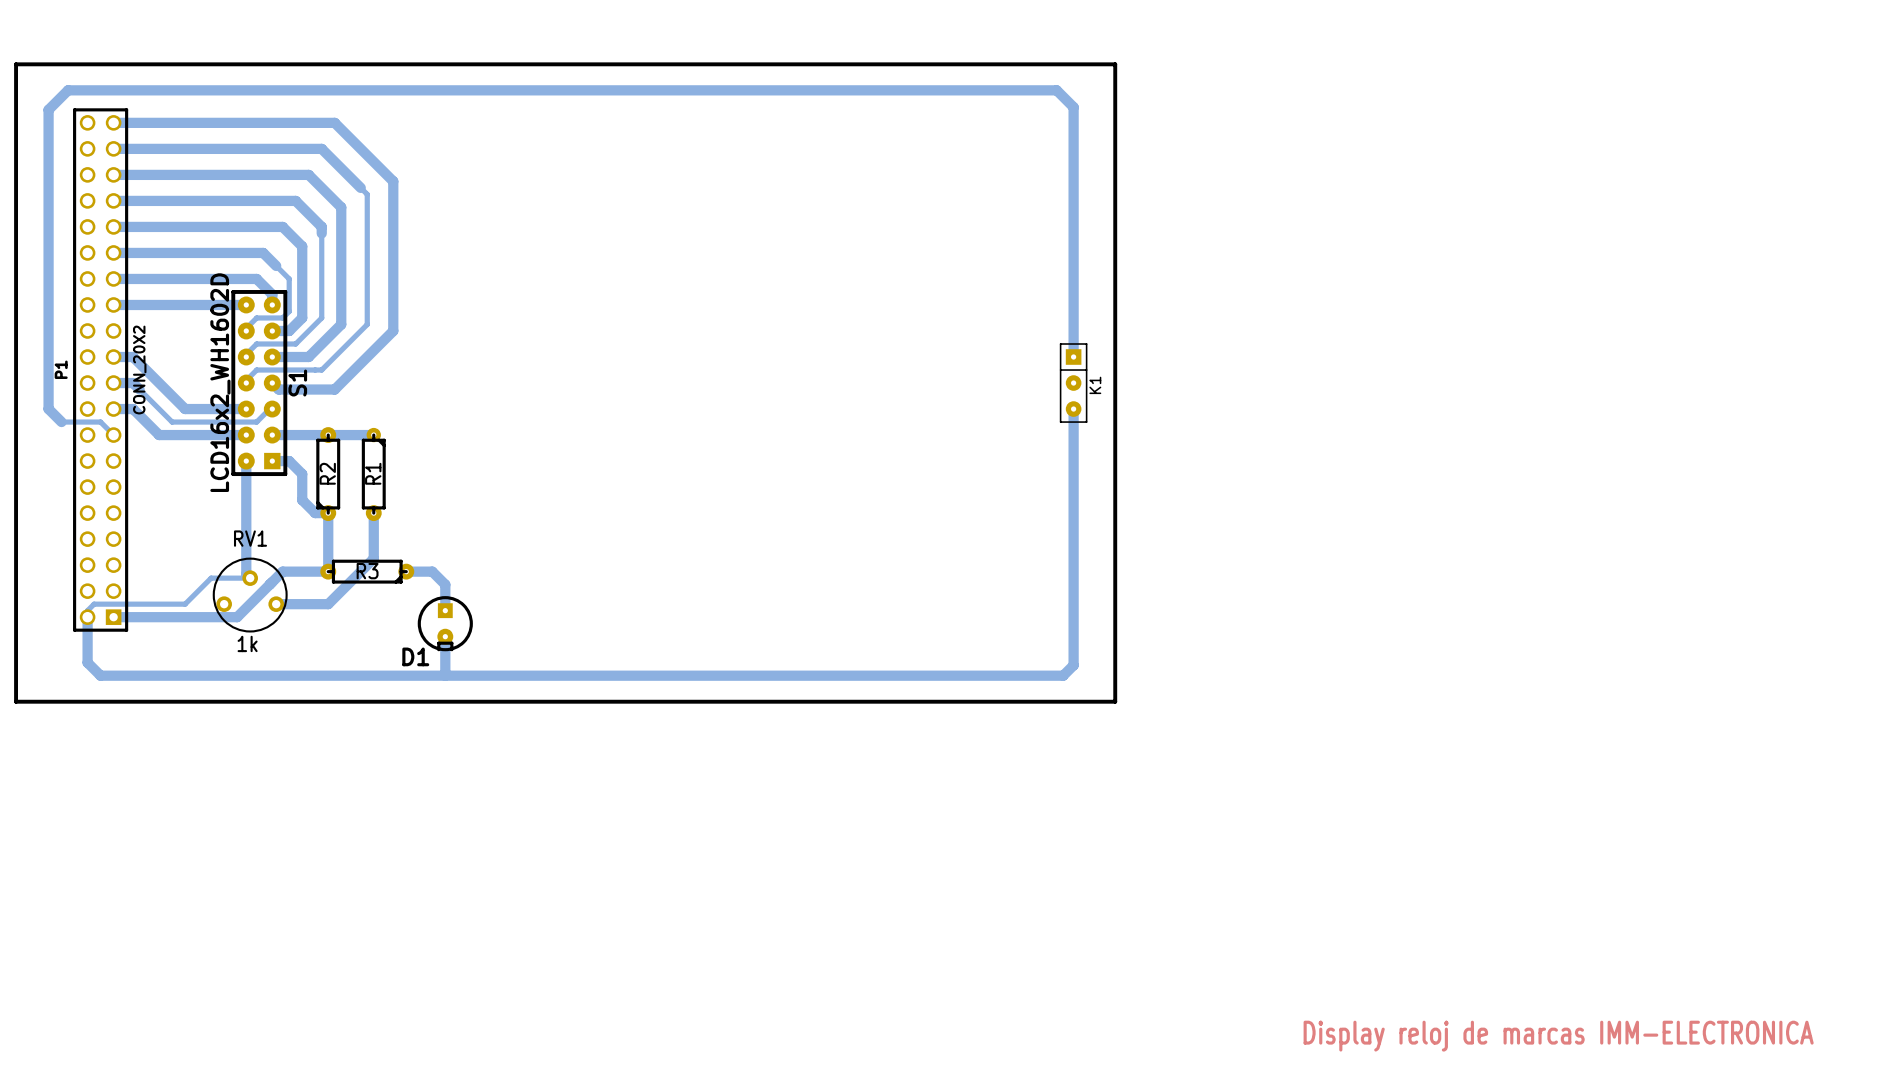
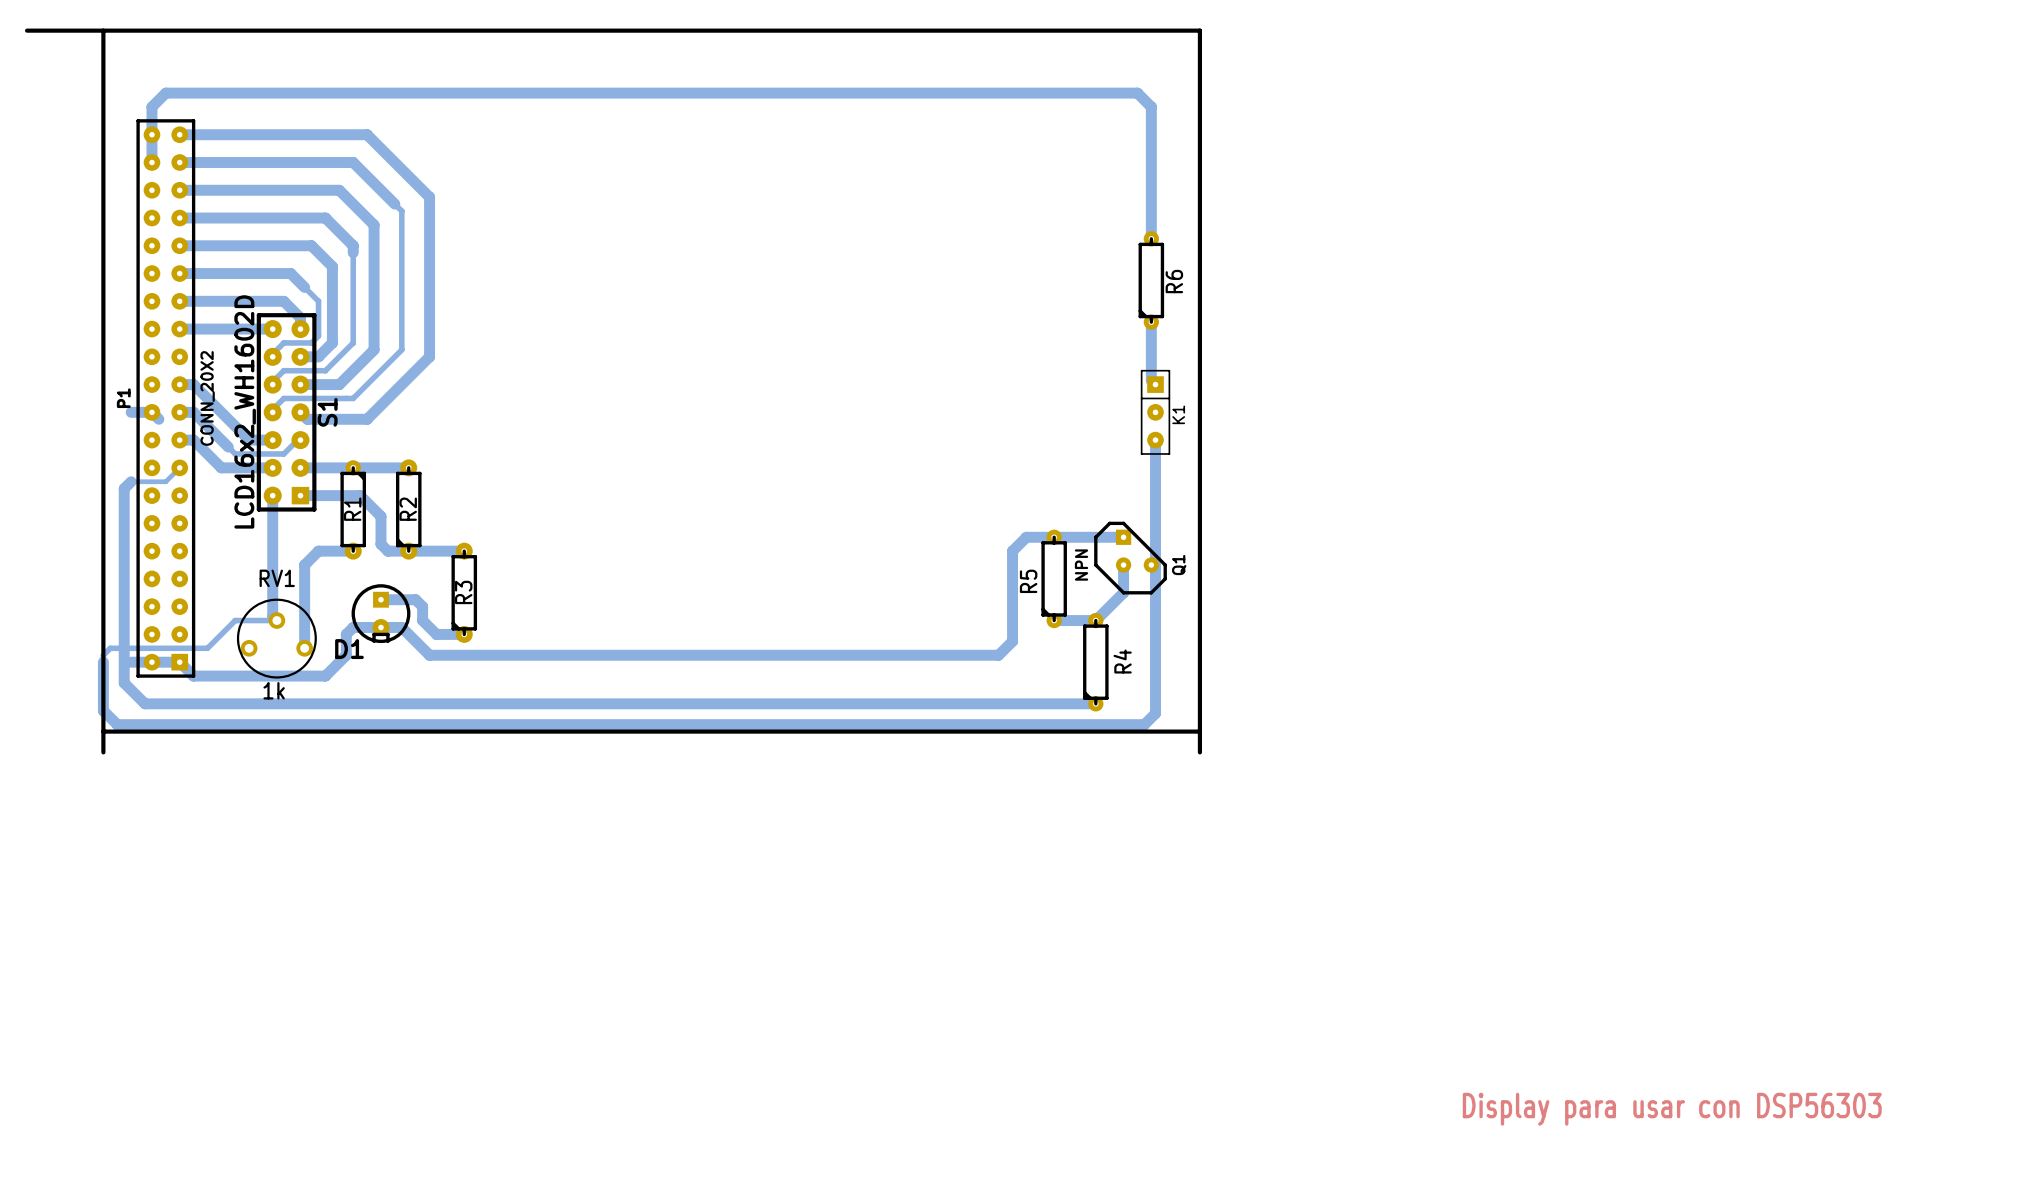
board edge: none -> (103, 30) (103, 752)
board edge: (1115, 64) (16, 64) (16, 701) (1115, 701) -> (1199, 72) (1199, 30) (27, 30)
P1 footprint: [73, 108, 129, 632] -> [136, 119, 196, 678]
bottom track: (113, 122) (159, 122) -> none
bottom track: (113, 148) (159, 148) -> none
bottom track: none -> (151, 162) (151, 106) (165, 93) (1137, 93) (1151, 106) (1151, 238)
bottom track: (113, 174) (159, 174) -> none
bottom track: (113, 200) (159, 200) -> none
bottom track: (113, 226) (159, 226) -> none
bottom track: (113, 252) (159, 252) -> none
R6: none -> (1151, 280)
bottom track: (113, 278) (159, 278) -> none
bottom track: (113, 304) (159, 304) -> none
bottom track: (113, 357) (133, 357) (185, 409) (224, 409) -> (179, 384) (193, 384) (249, 440)
bottom track: (1073, 357) (1073, 107) (1056, 90) (68, 90) (48, 109) (48, 409) (61, 422) (100, 422) (113, 435) -> (1155, 384) (1151, 380) (1151, 322)
bottom track: (133, 383) (172, 422) (211, 422) -> (179, 412) (193, 412) (235, 453)
bottom track: (113, 409) (133, 409) (159, 435) (198, 435) -> (179, 440) (193, 440) (221, 467)
bottom track: none -> (179, 467) (165, 481) (131, 481) (124, 488) (124, 683) (145, 703) (1095, 703)
bottom track: (289, 461) (302, 474) (302, 500) (315, 513) -> (318, 495) (360, 495) (380, 516) (380, 544) (387, 551) (464, 551)
R2 position: (328, 474) -> (408, 509)
R1 position: (373, 474) -> (353, 509)
bottom track: (321, 513) (328, 513) (328, 571) (282, 571) (237, 617) (159, 617) -> (1123, 537) (1026, 537) (1012, 551) (1012, 641) (998, 655) (429, 655) (401, 627) (353, 627) (346, 634) (346, 655) (325, 676) (193, 676) (179, 662)
bottom track: (373, 513) (373, 558) (328, 604) (276, 604) -> (346, 551) (318, 551) (304, 565) (304, 648)
Q1: none -> NPN (1130, 558)
bottom track: none -> (1123, 565) (1123, 592) (1095, 620) (1054, 620)
R5: none -> (1054, 578)
bottom track: none -> (380, 599) (415, 599) (422, 606) (422, 620) (436, 634) (464, 634)
R3 rotation: 0° (367, 571) -> 90° clockwise (464, 592)
R3 position: (367, 571) -> (464, 592)
bottom track: (406, 571) (432, 571) (445, 584) (445, 610) -> none
R4: none -> (1095, 662)
D1 position: (445, 623) -> (380, 613)
bottom track: (445, 636) (445, 675) -> none
board edge: none -> (103, 731) (1199, 731)
text: Display reloj de marcas IMM-ELECTRONICA (1558, 1036) -> Display para usar con DSP56303 (1672, 1109)

